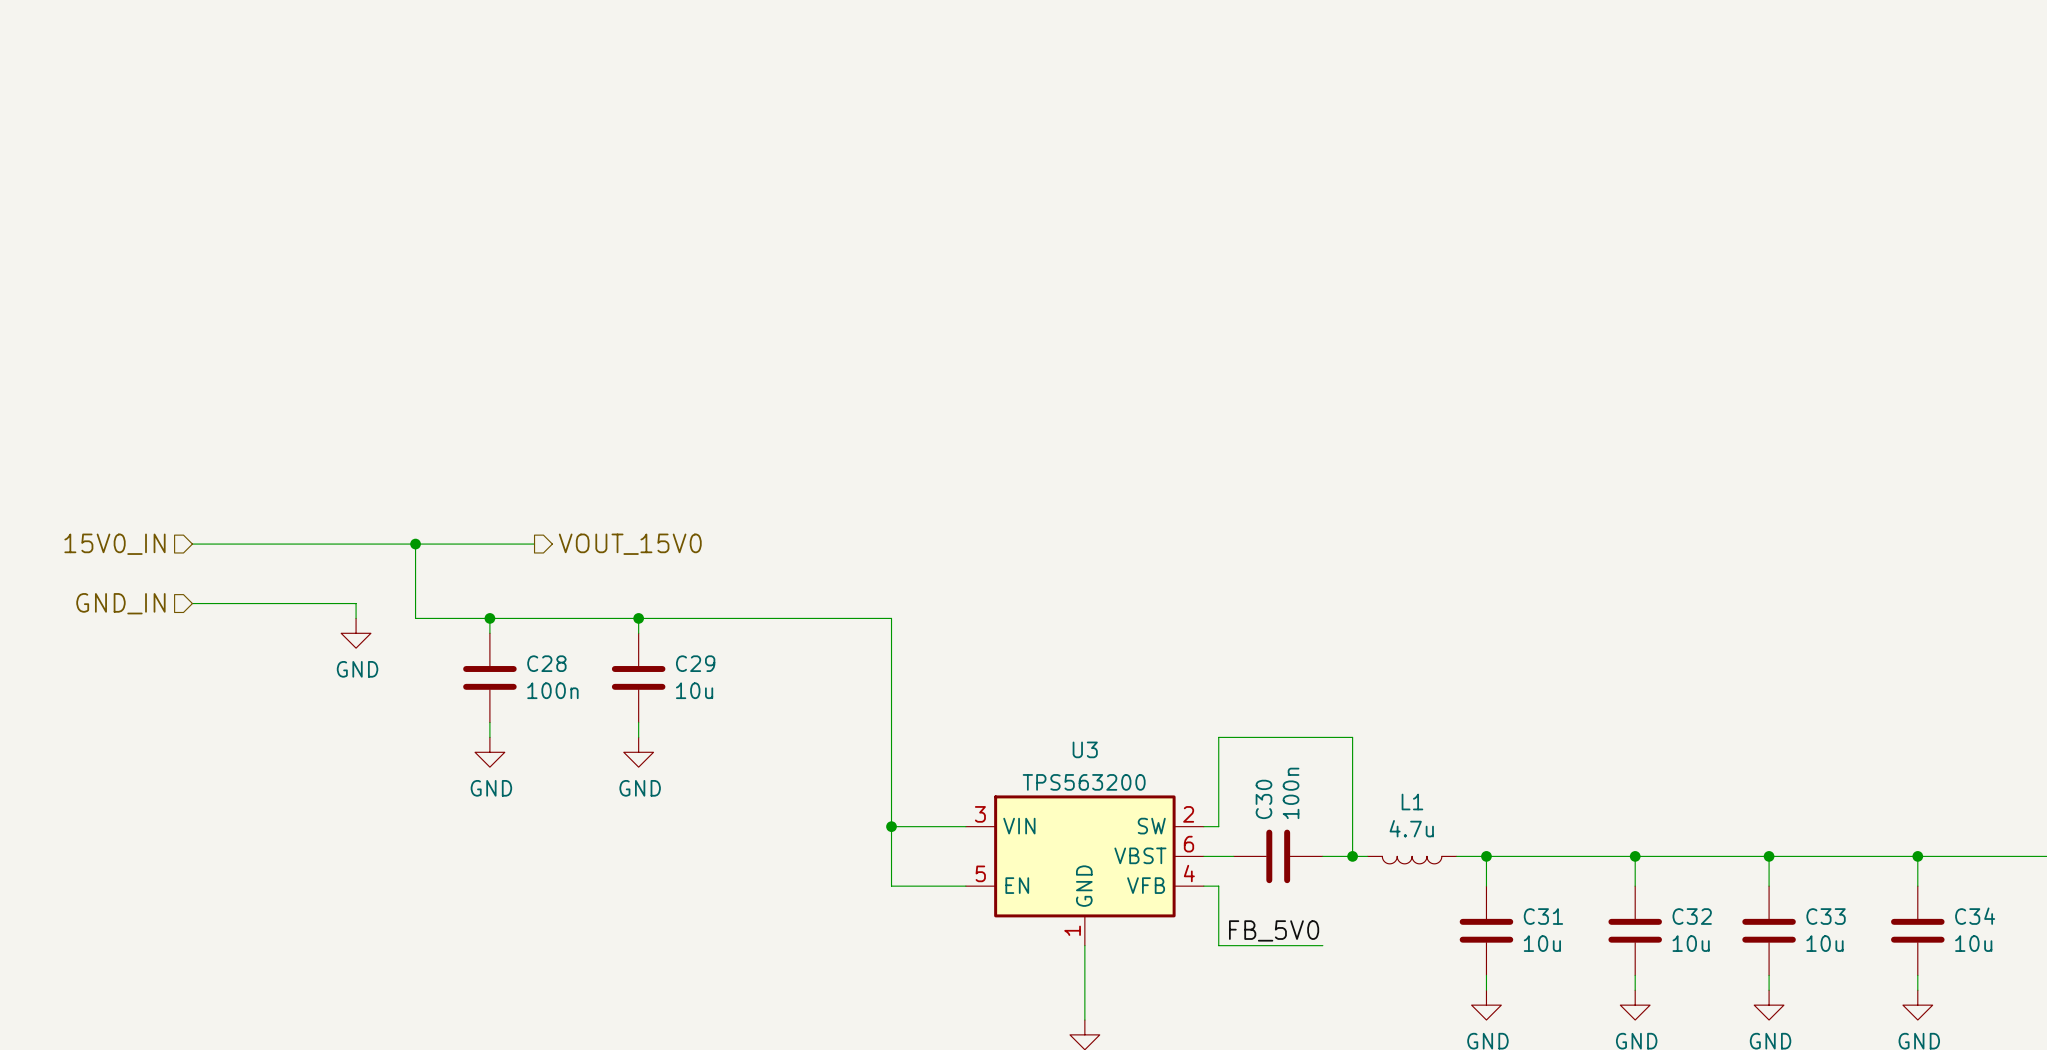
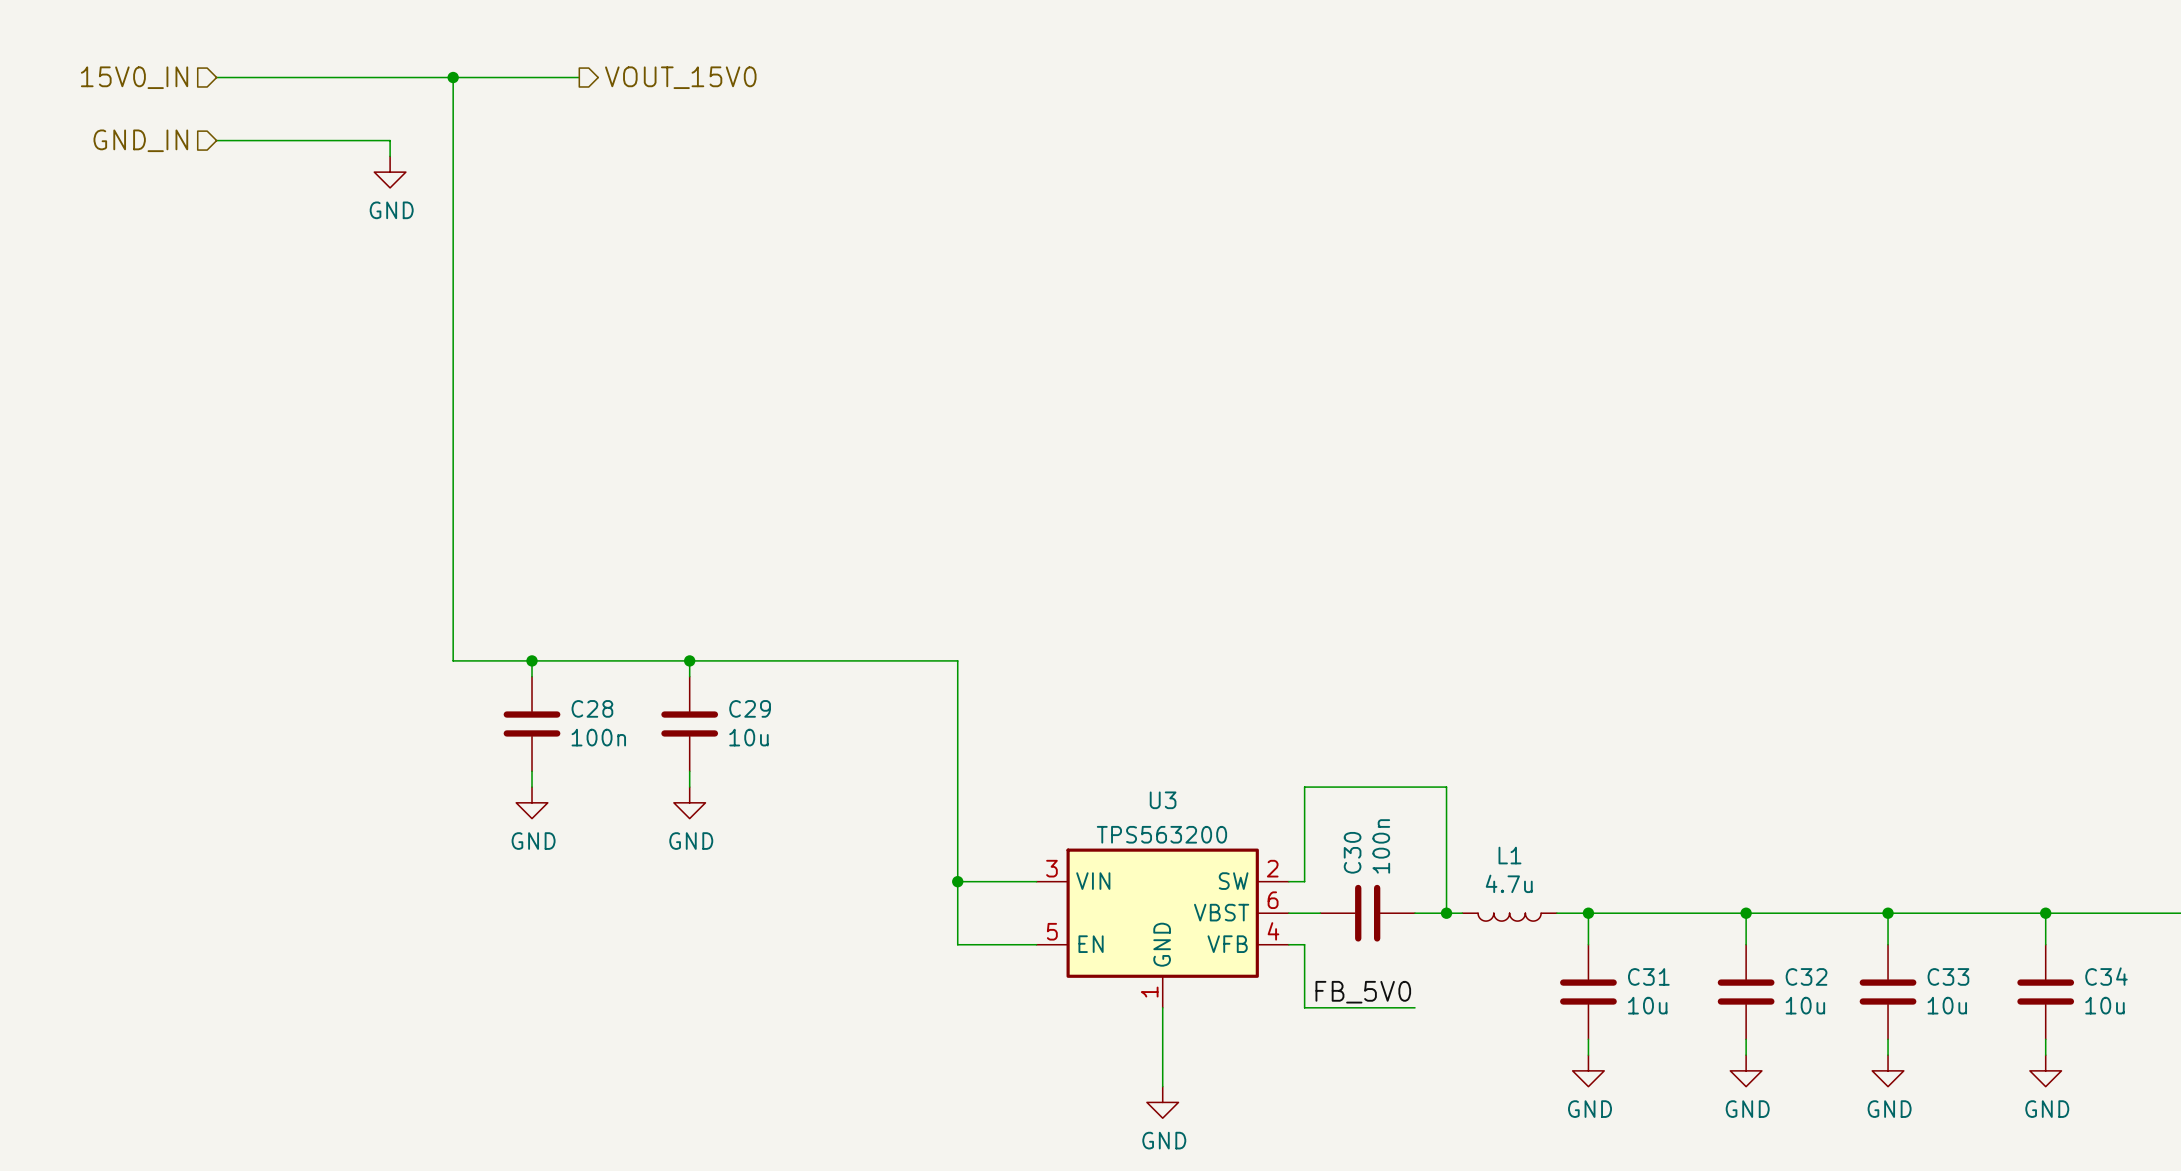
hierarchical label: none -> 15V0_IN (134, 77)
wire: none -> (216, 77) (579, 77)
wire: none -> (453, 77) (453, 582)
junction: none -> (453, 77)
hierarchical label: none -> VOUT_15V0 (680, 77)
hierarchical label: none -> GND_IN (140, 140)
wire: none -> (216, 140) (390, 140) (390, 156)
power symbol: none -> GND (390, 172)
hierarchical label: 15V0_IN (114, 544) -> none
wire: (192, 544) (534, 544) -> none
junction: (415, 544) -> none
hierarchical label: VOUT_15V0 (630, 544) -> none
hierarchical label: GND_IN (120, 603) -> none
wire: (192, 603) (356, 603) (356, 618) -> none
power symbol: GND (356, 633) -> none

